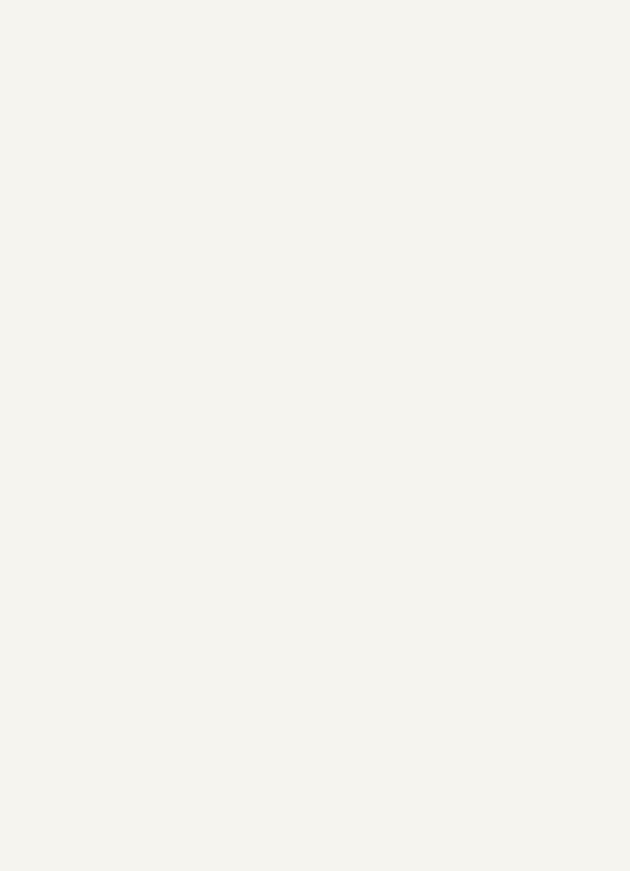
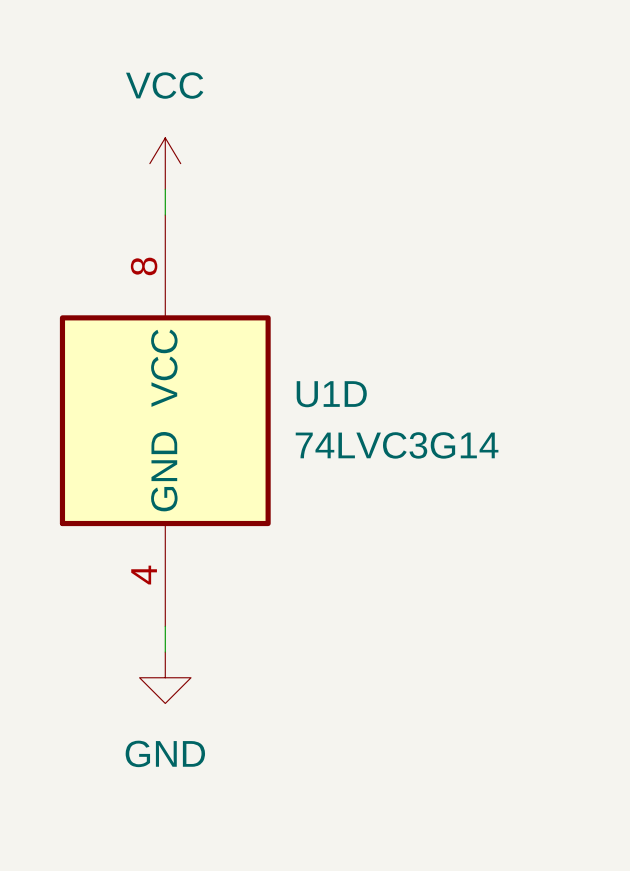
power symbol: none -> VCC (165, 163)
wire: none -> (165, 189) (165, 215)
U1D: none -> 74LVC3G14 (165, 420)
wire: none -> (165, 626) (165, 652)
power symbol: none -> GND (165, 677)

